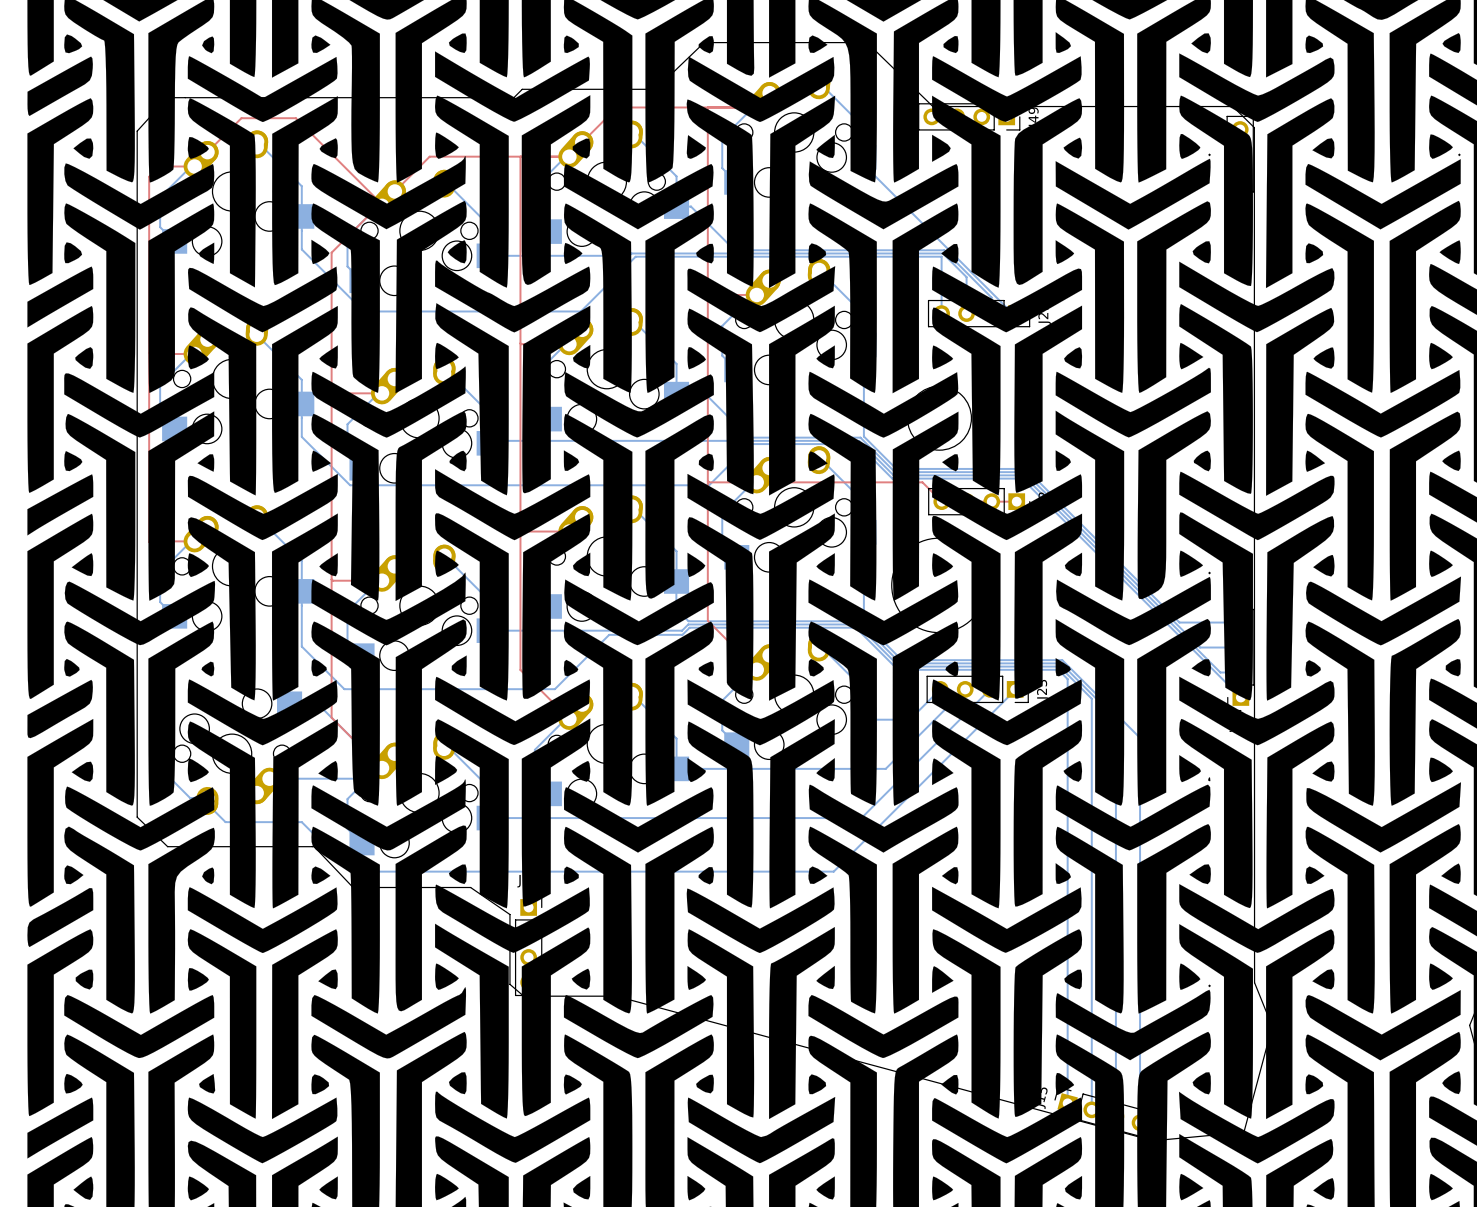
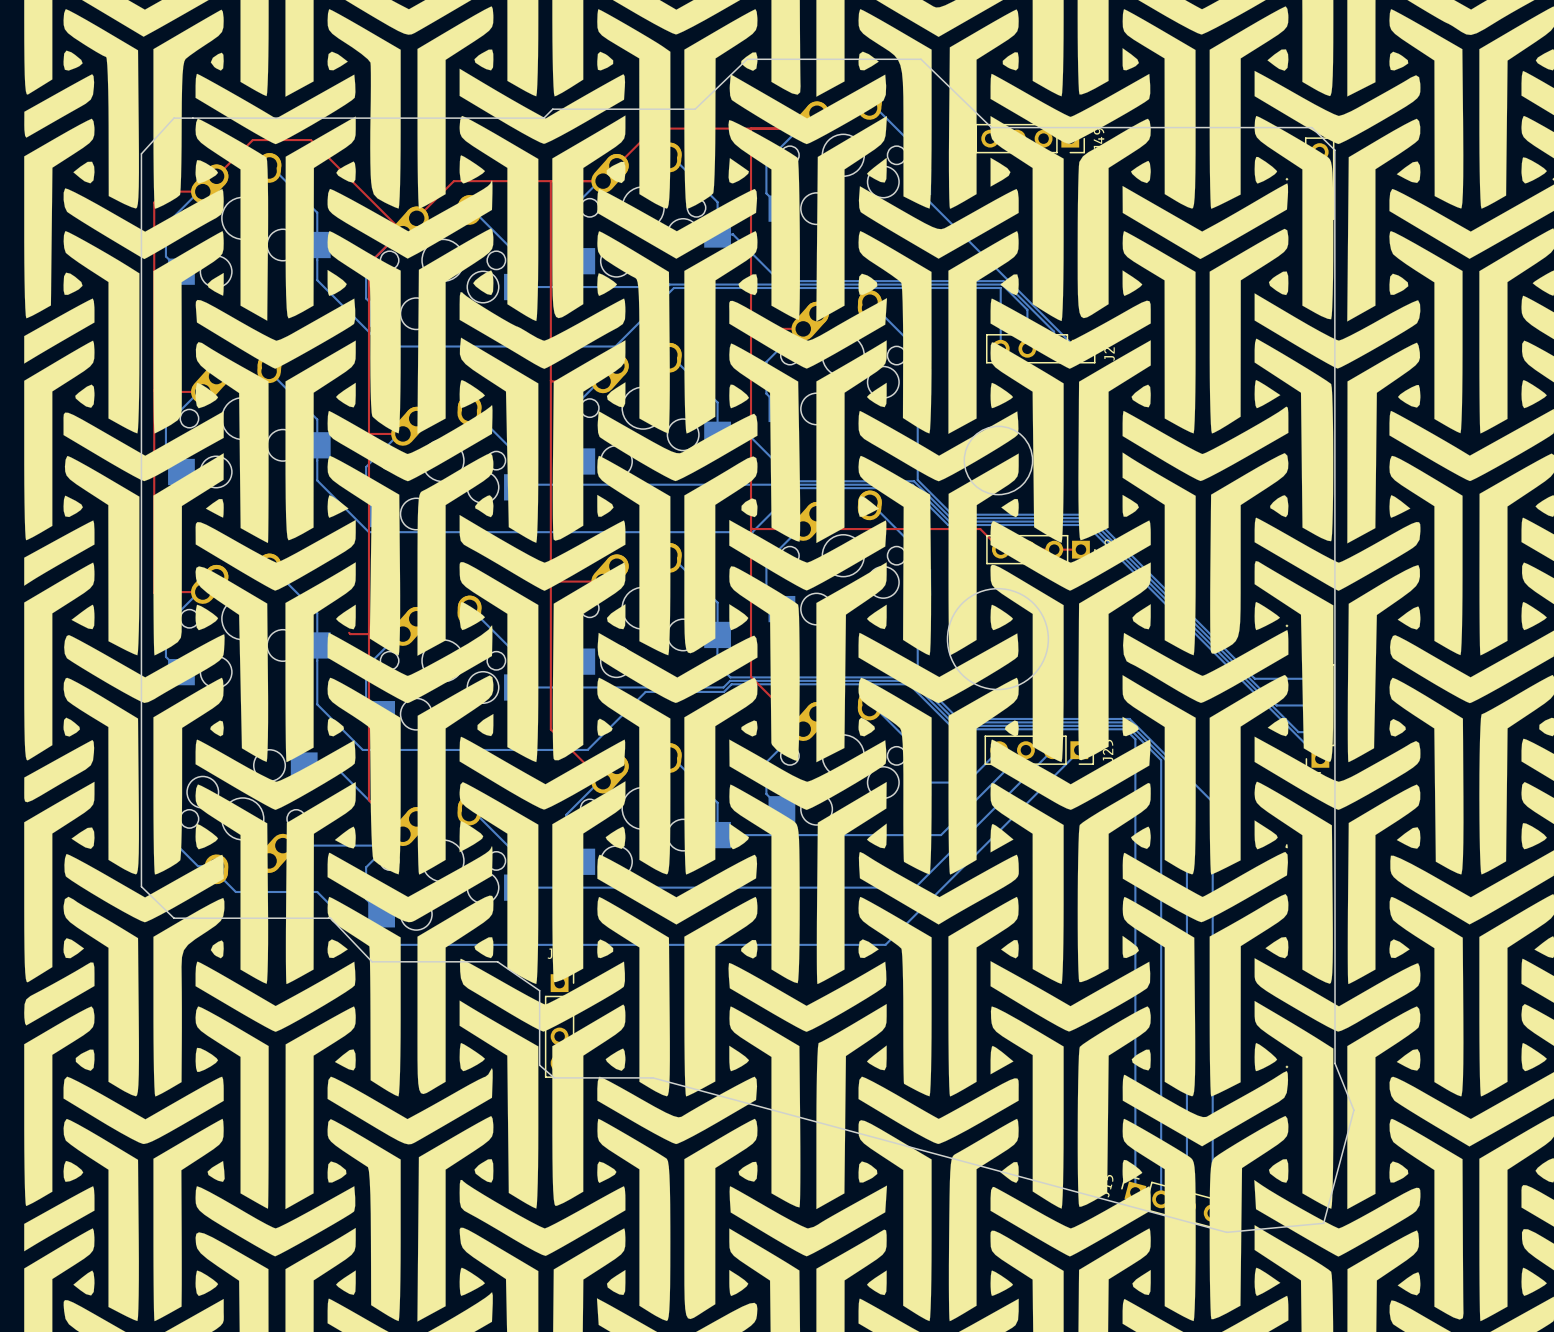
top track: (350, 234) (331, 252) (331, 717) (350, 736) -> (368, 263) (368, 800)

